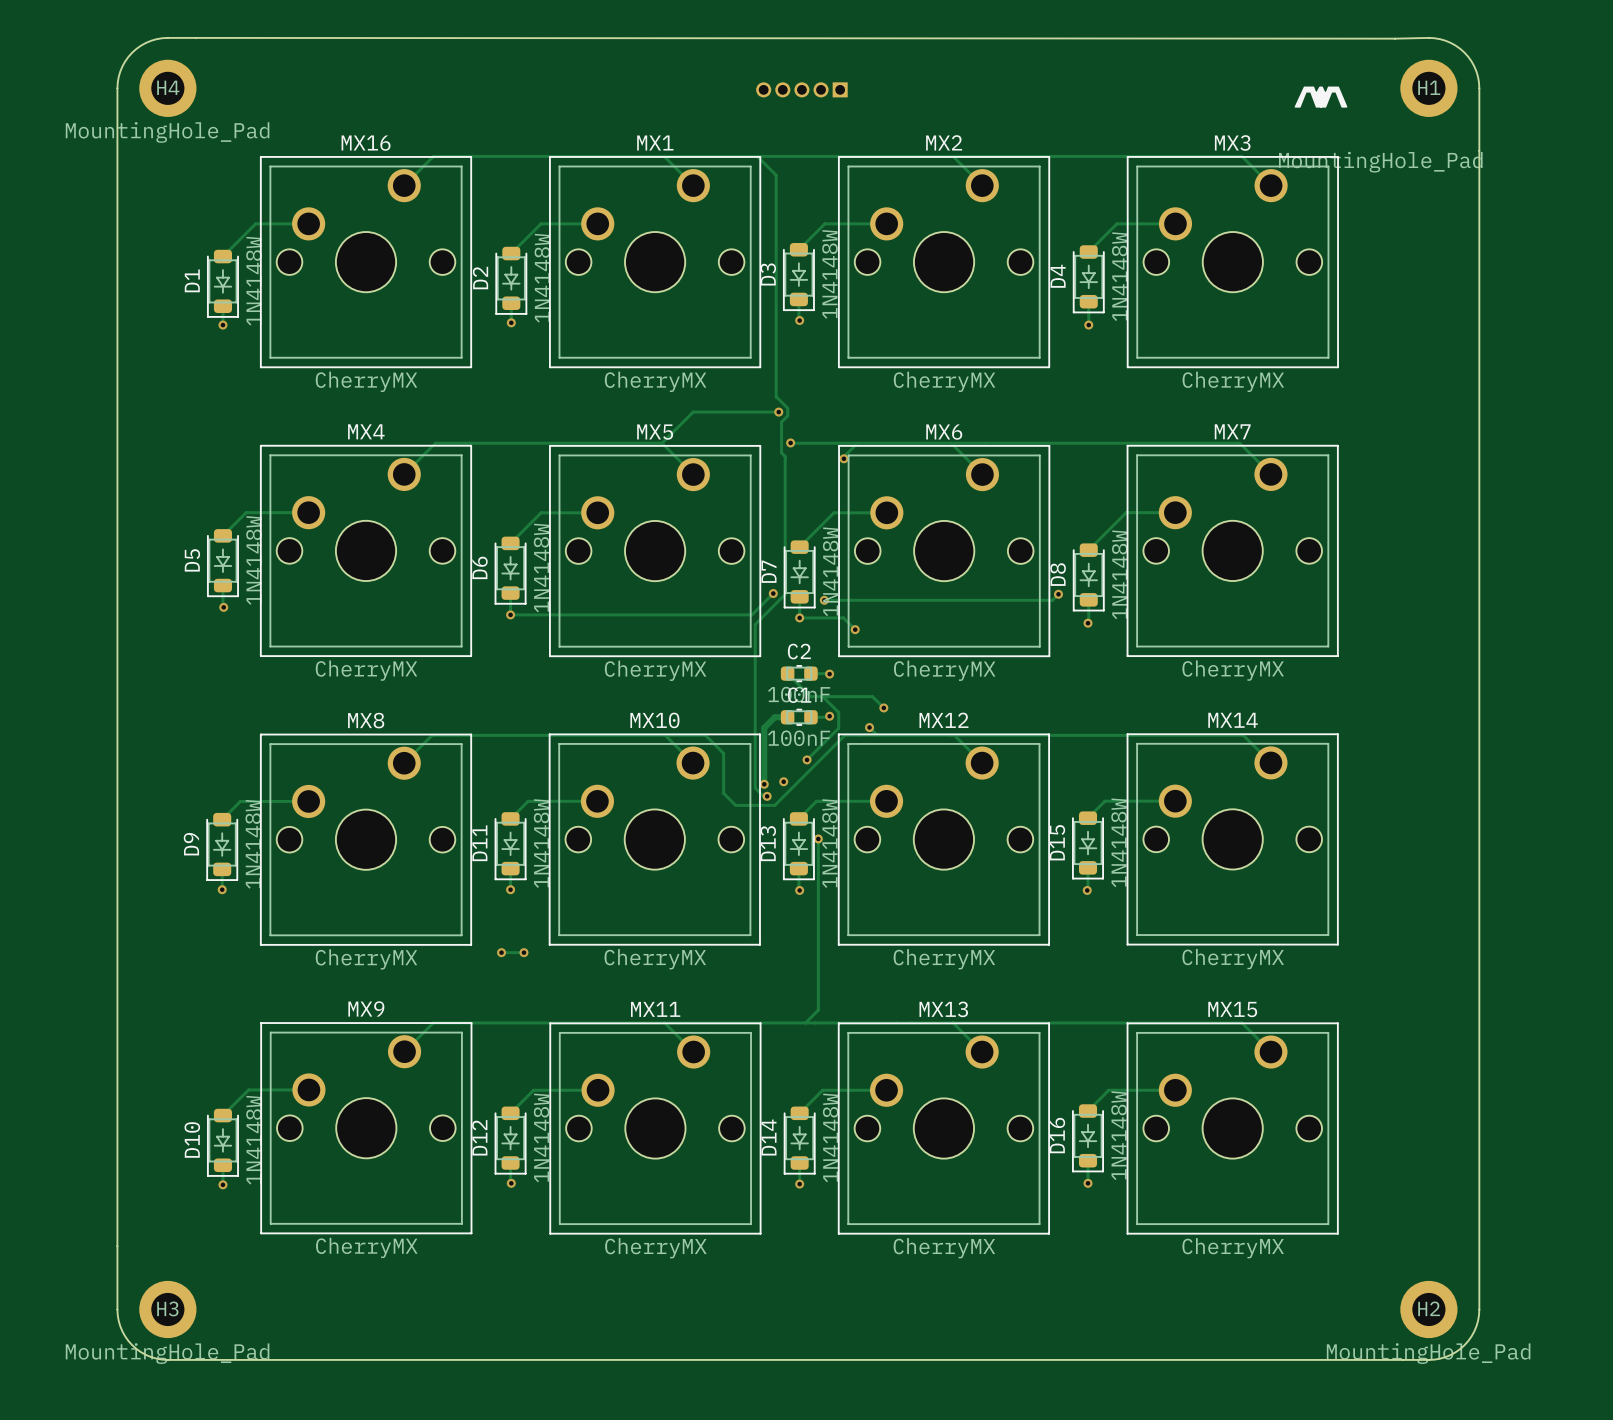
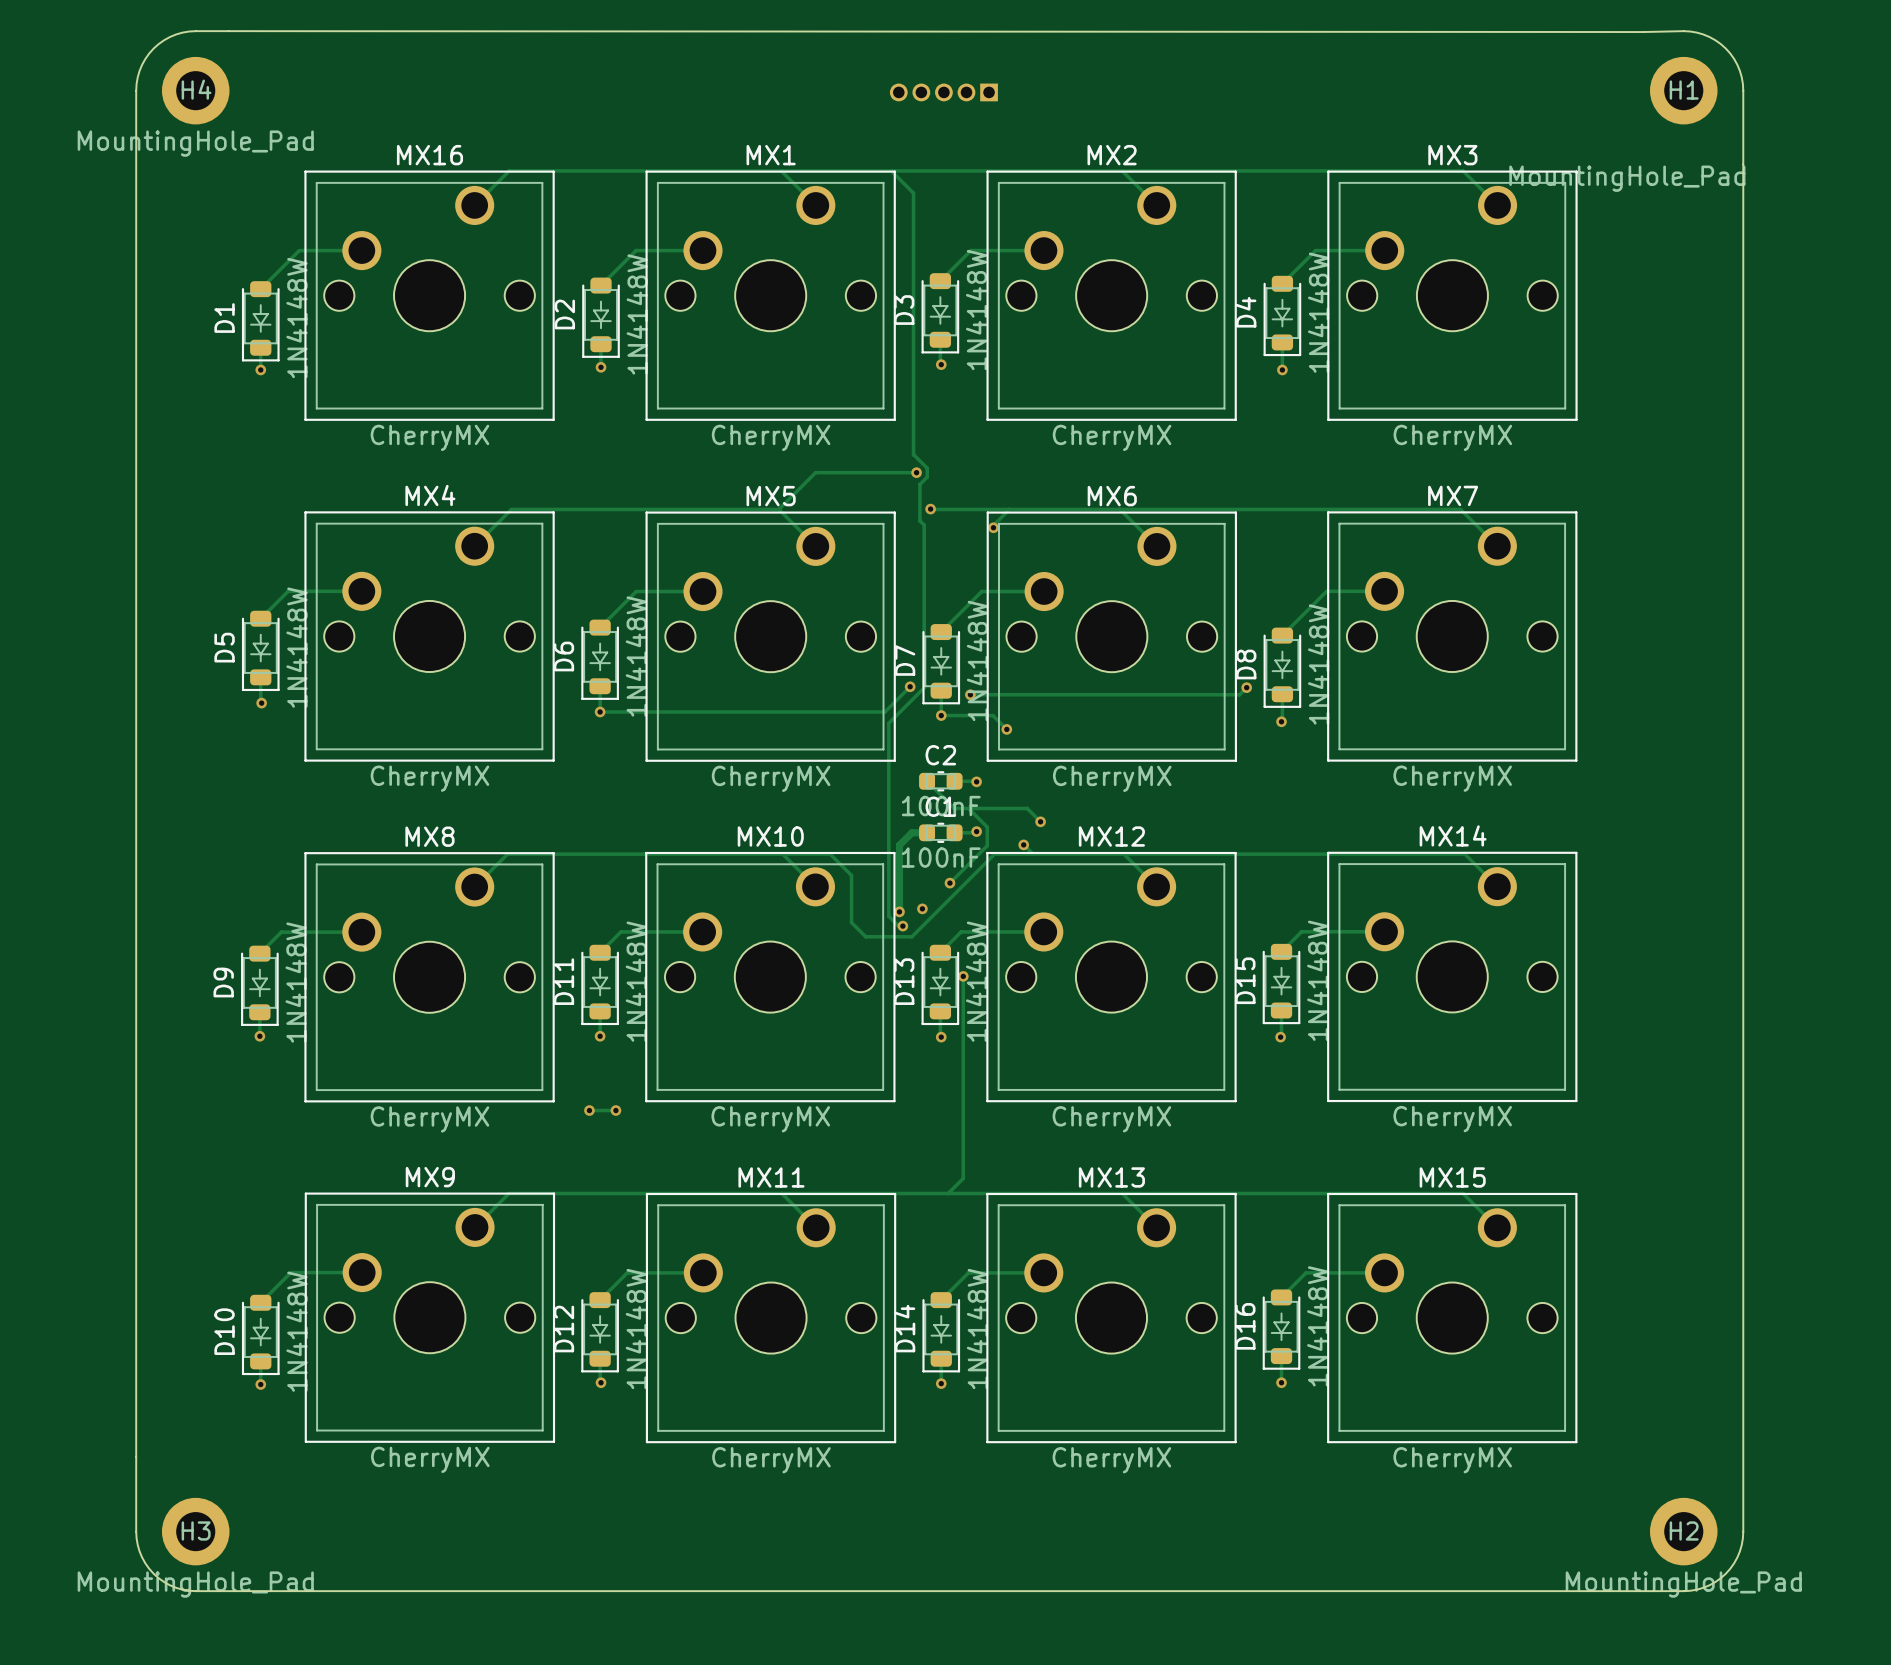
drawing: [1294, 86, 1348, 108] -> none

